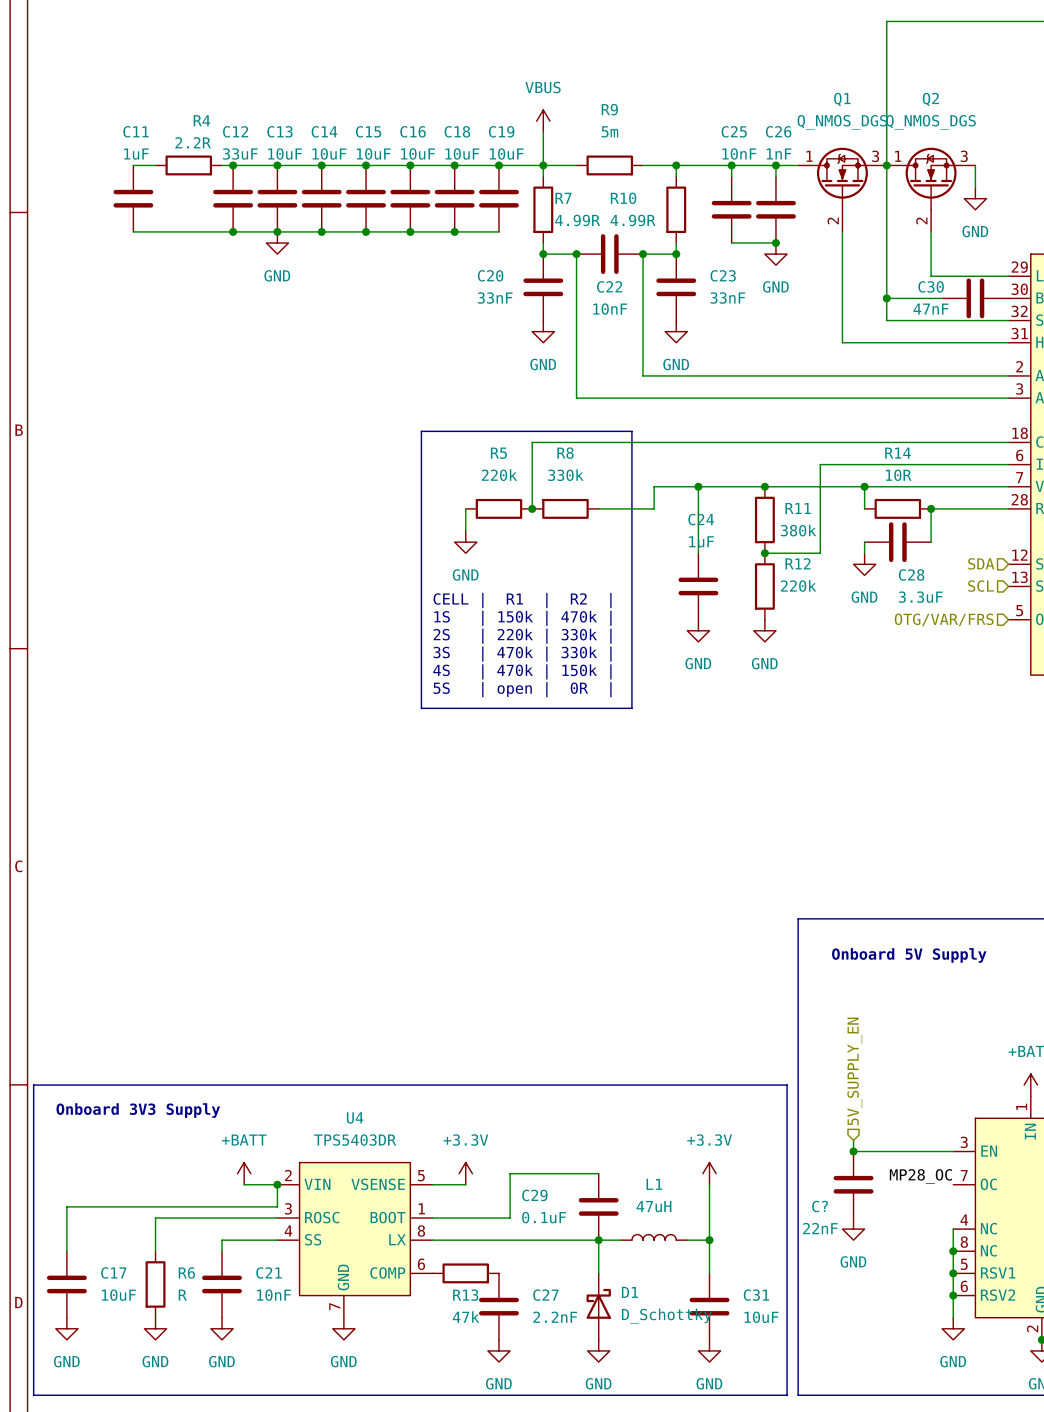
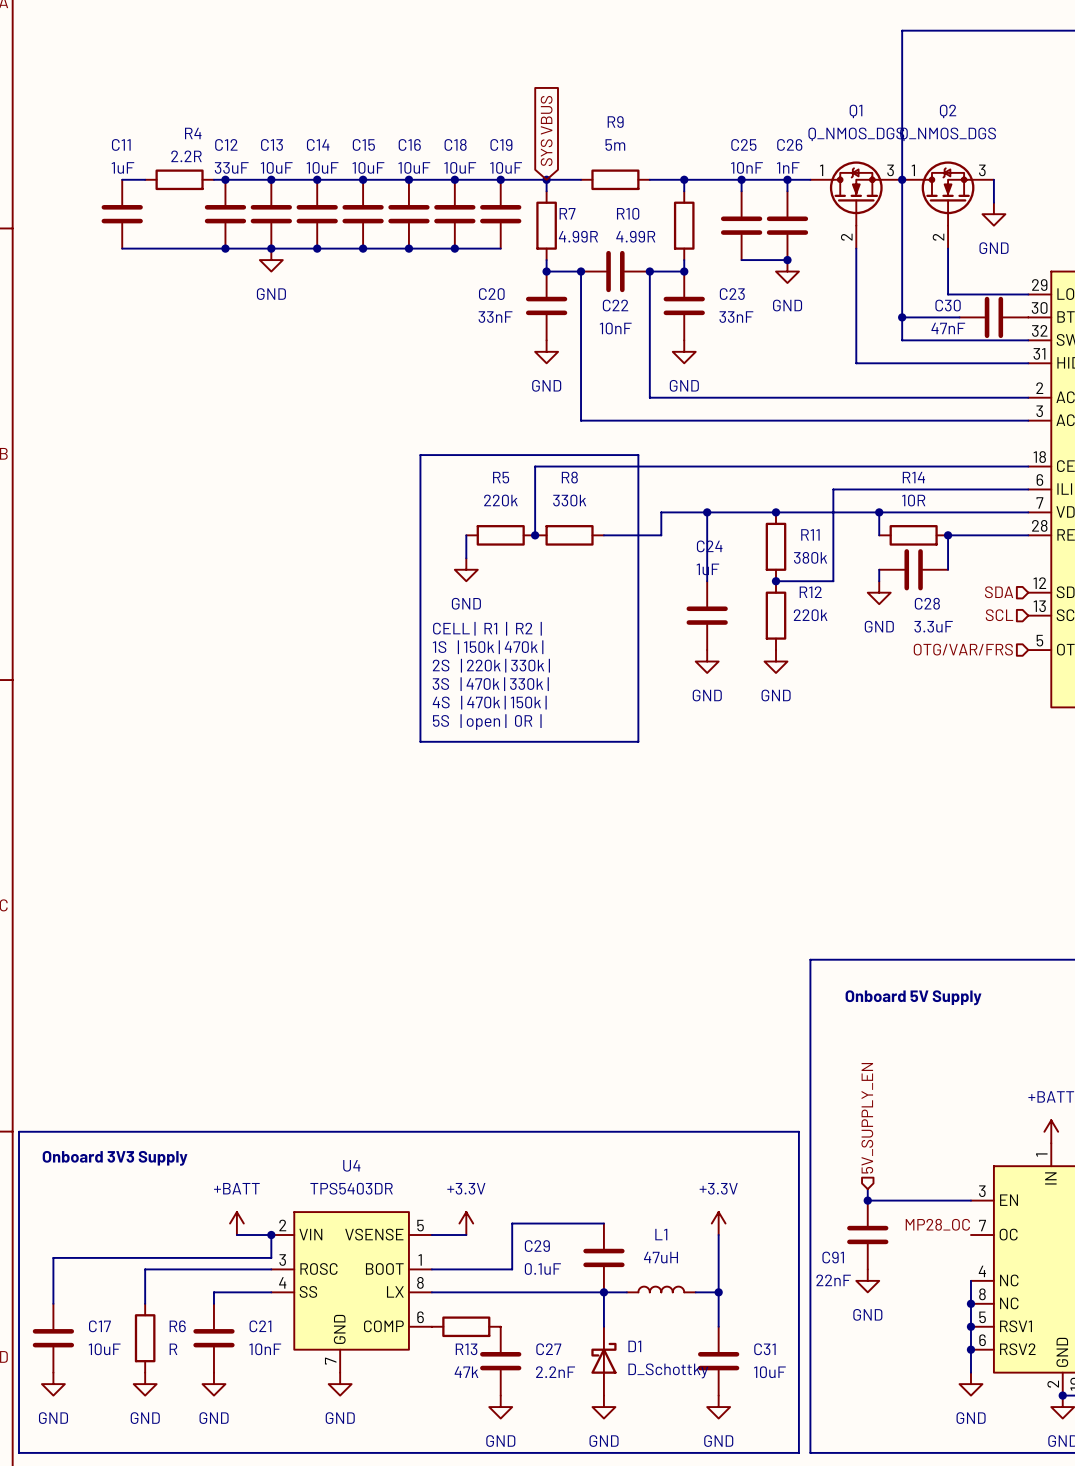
global label: none -> SYS VBUS (546, 130)
power symbol: VBUS (543, 121) -> none
wire: (543, 132) (543, 165) -> none
C? name: C? (820, 1206) -> C91 (833, 1257)

